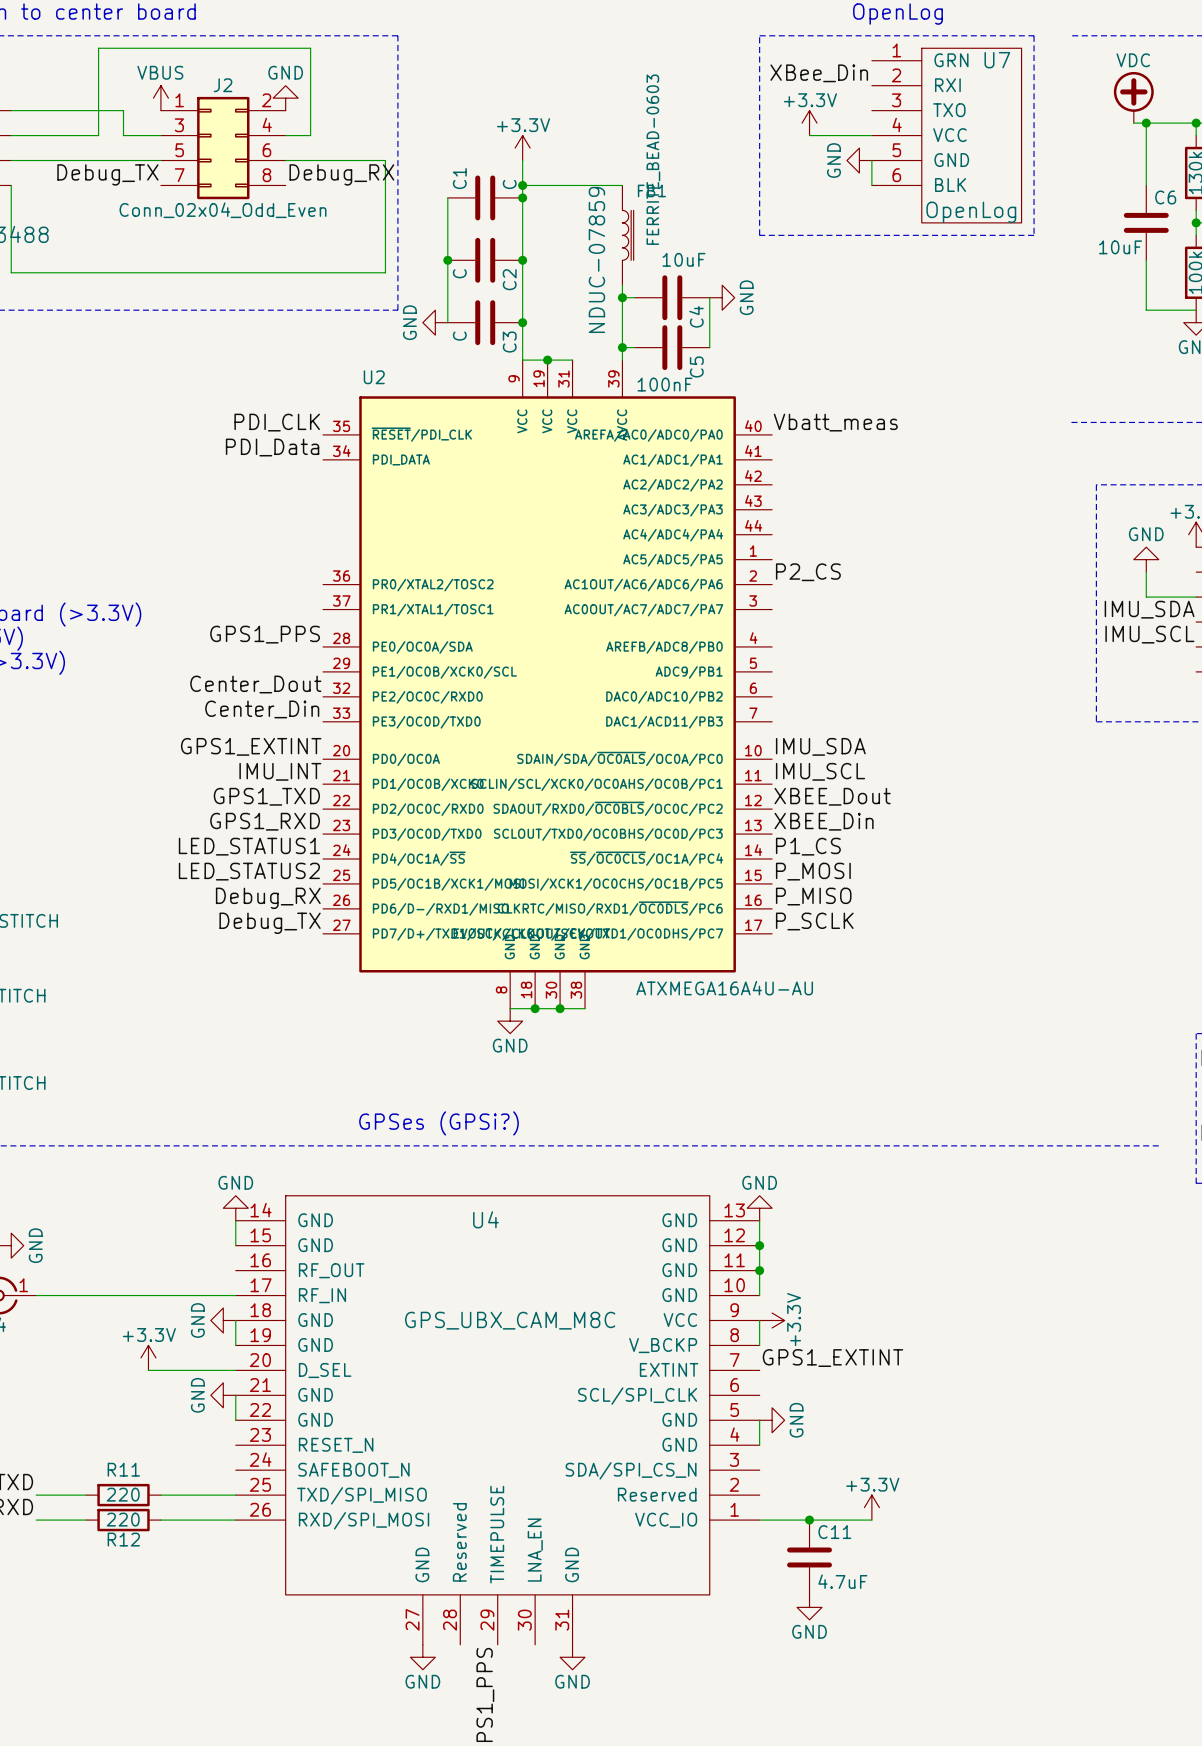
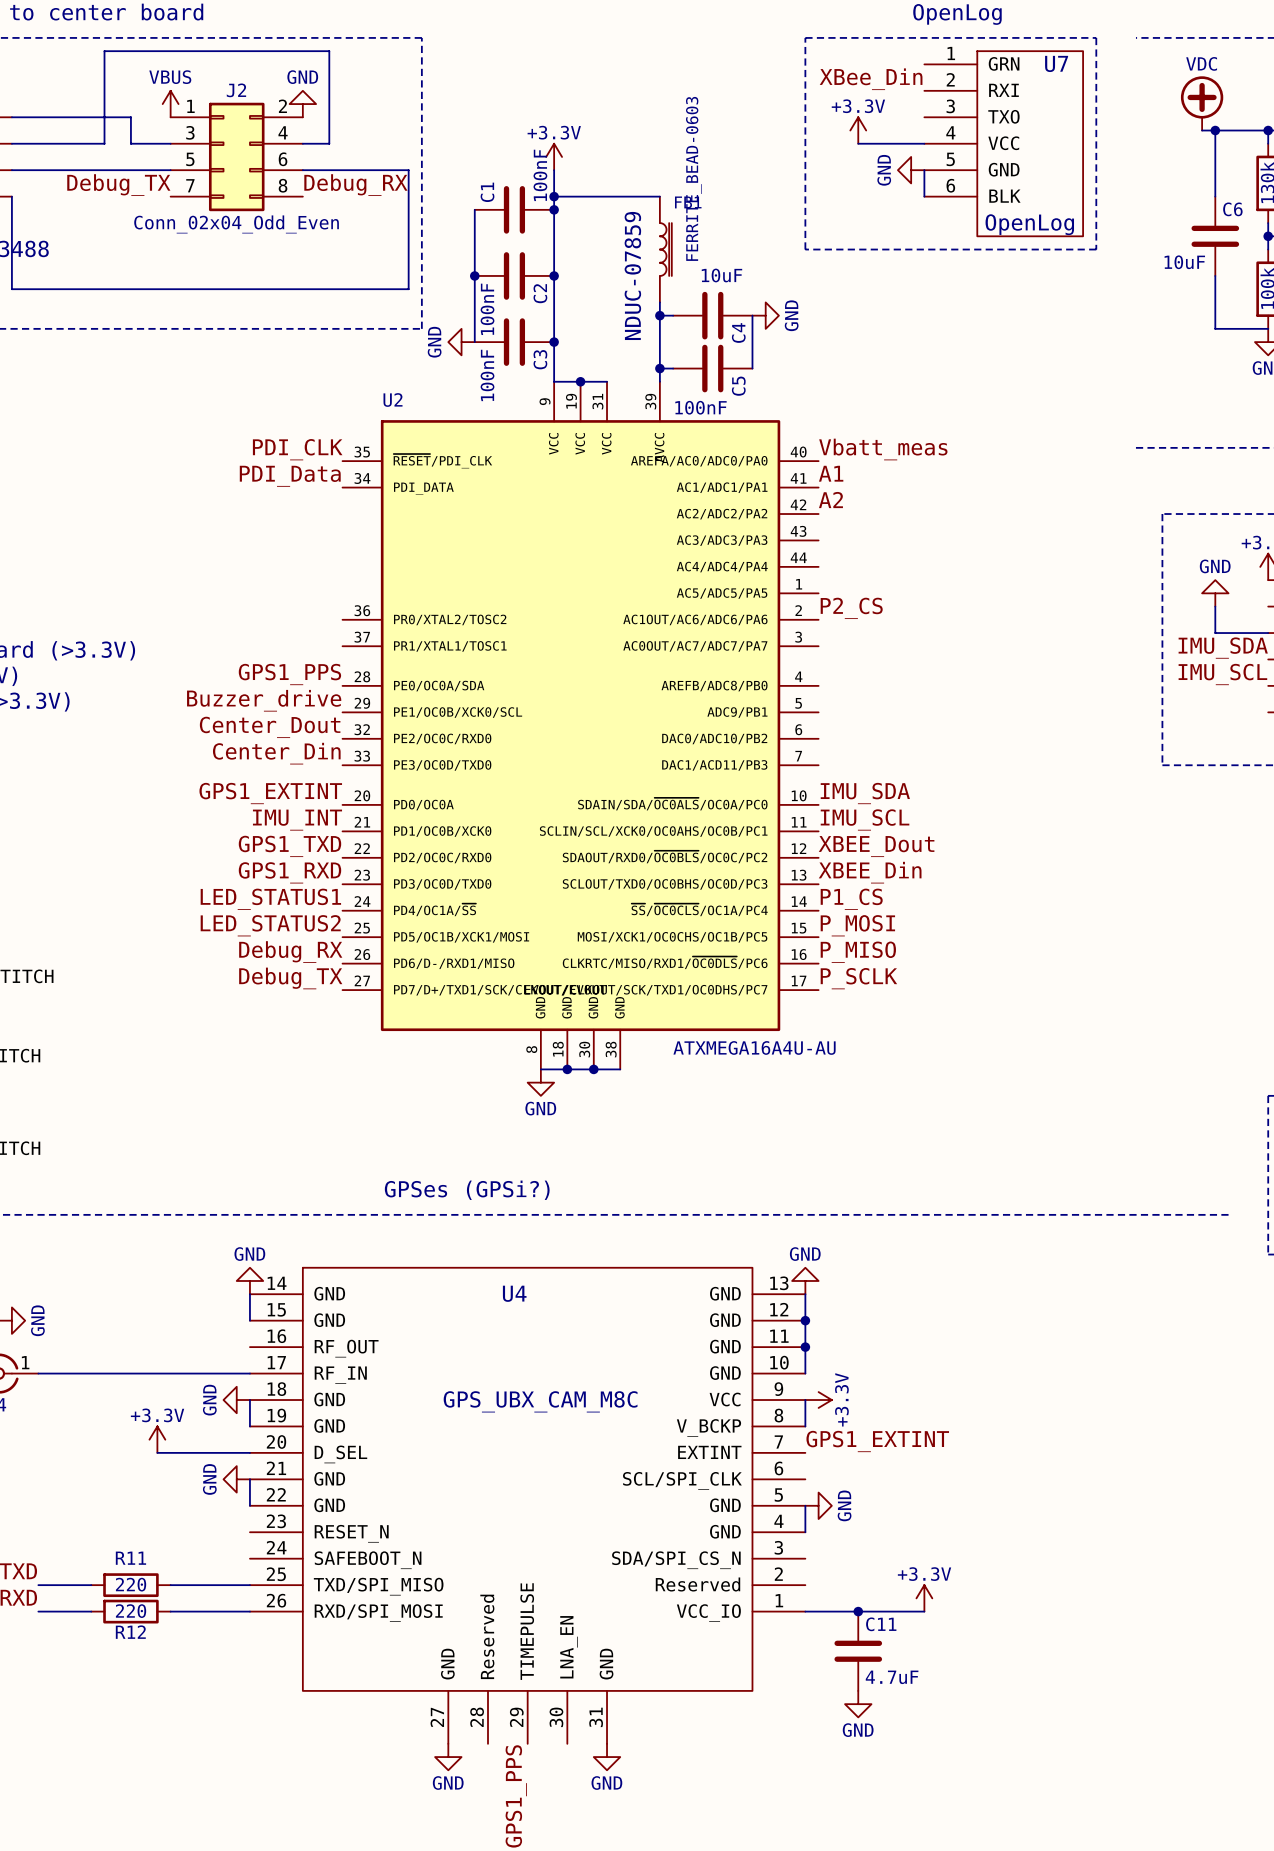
C1 value: C (509, 184) -> 100nF (540, 175)
C2 value: C (459, 273) -> 100nF (487, 309)
C3 value: C (459, 336) -> 100nF (487, 375)
label: none -> A1 (831, 473)
label: none -> A2 (830, 500)
label: none -> Buzzer_drive (264, 700)

